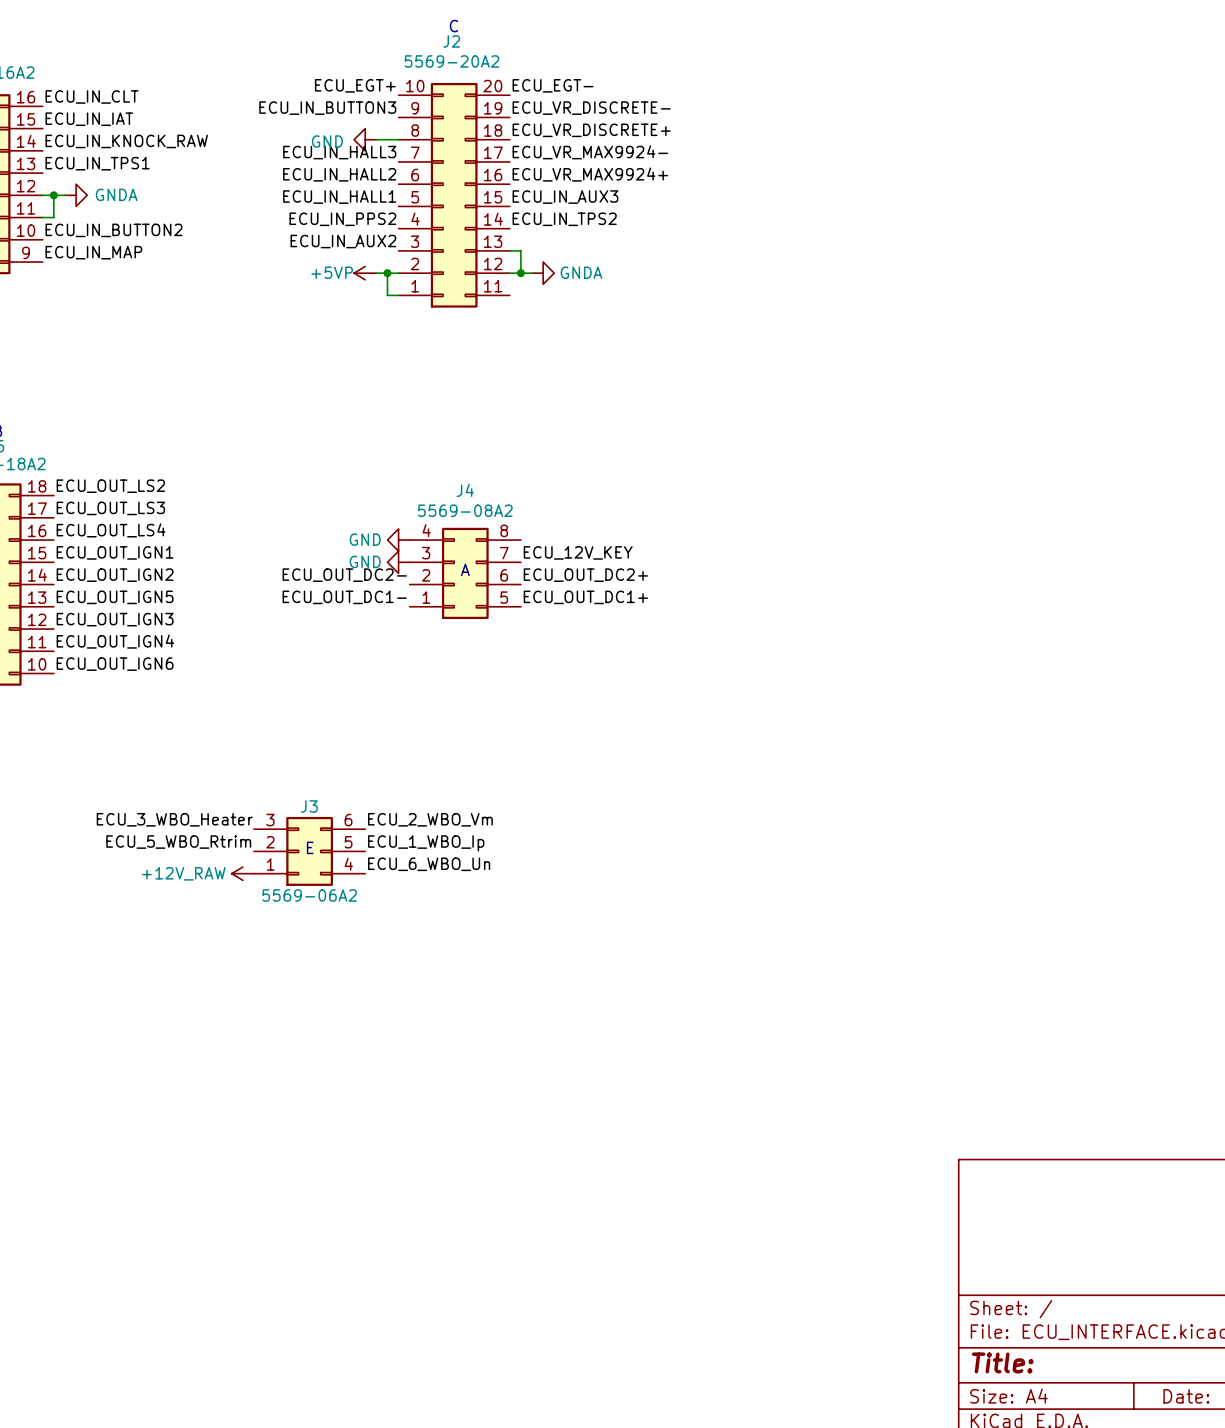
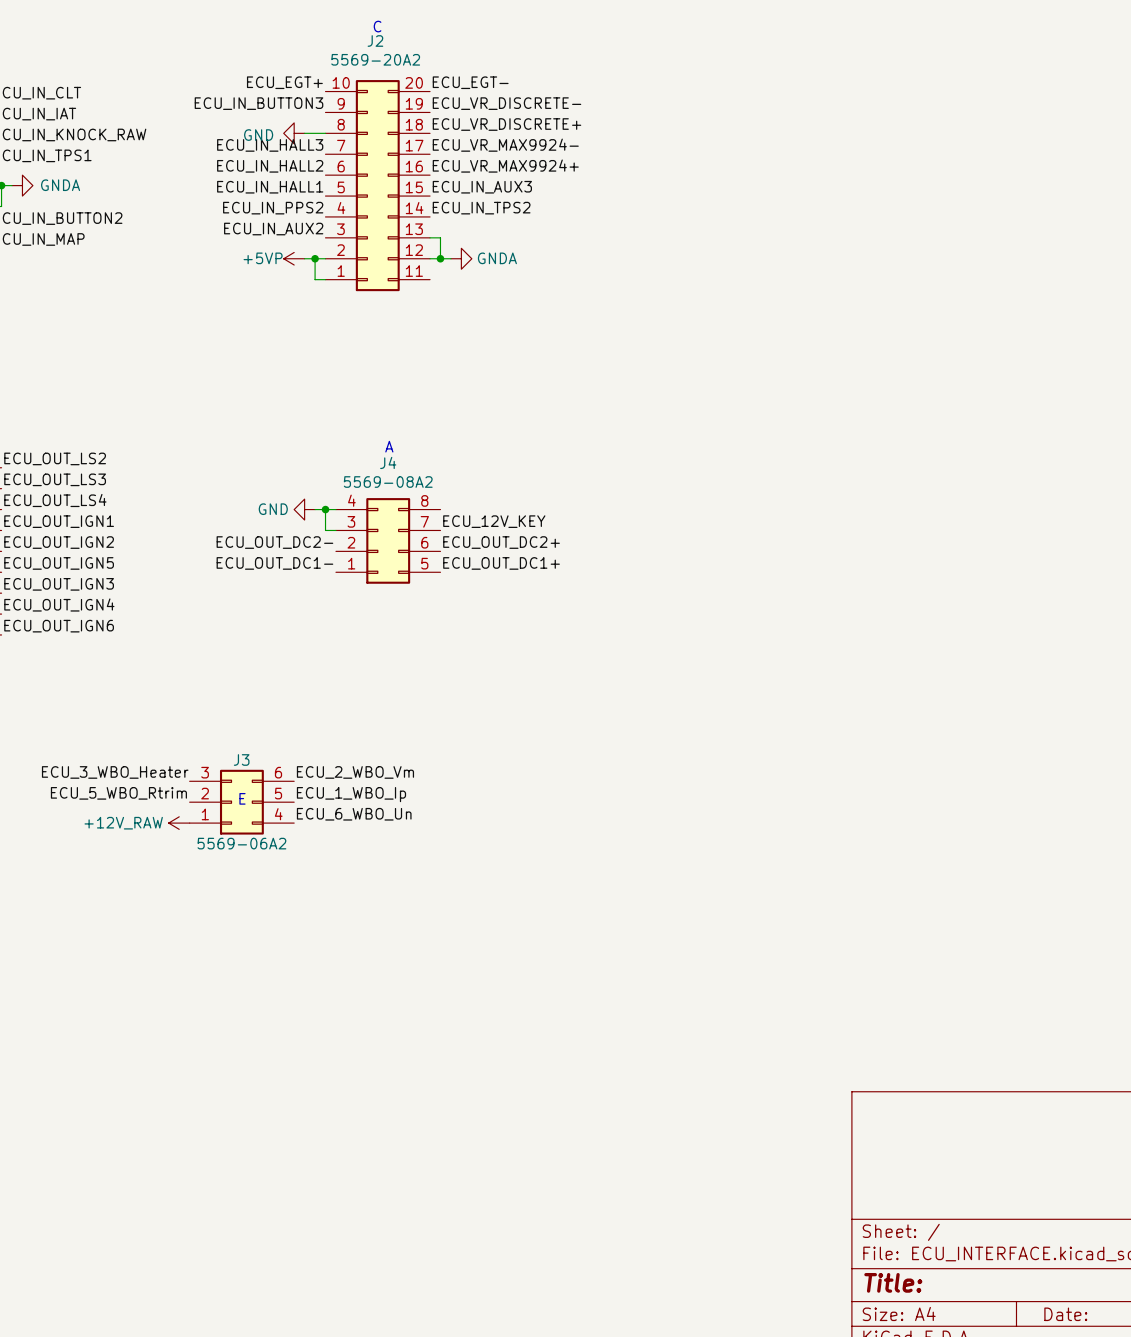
power symbol: none -> GND (304, 509)
power symbol: GND (398, 540) -> none
junction: none -> (325, 509)
power symbol: GND (398, 562) -> none
text position: A (465, 569) -> A (389, 446)

